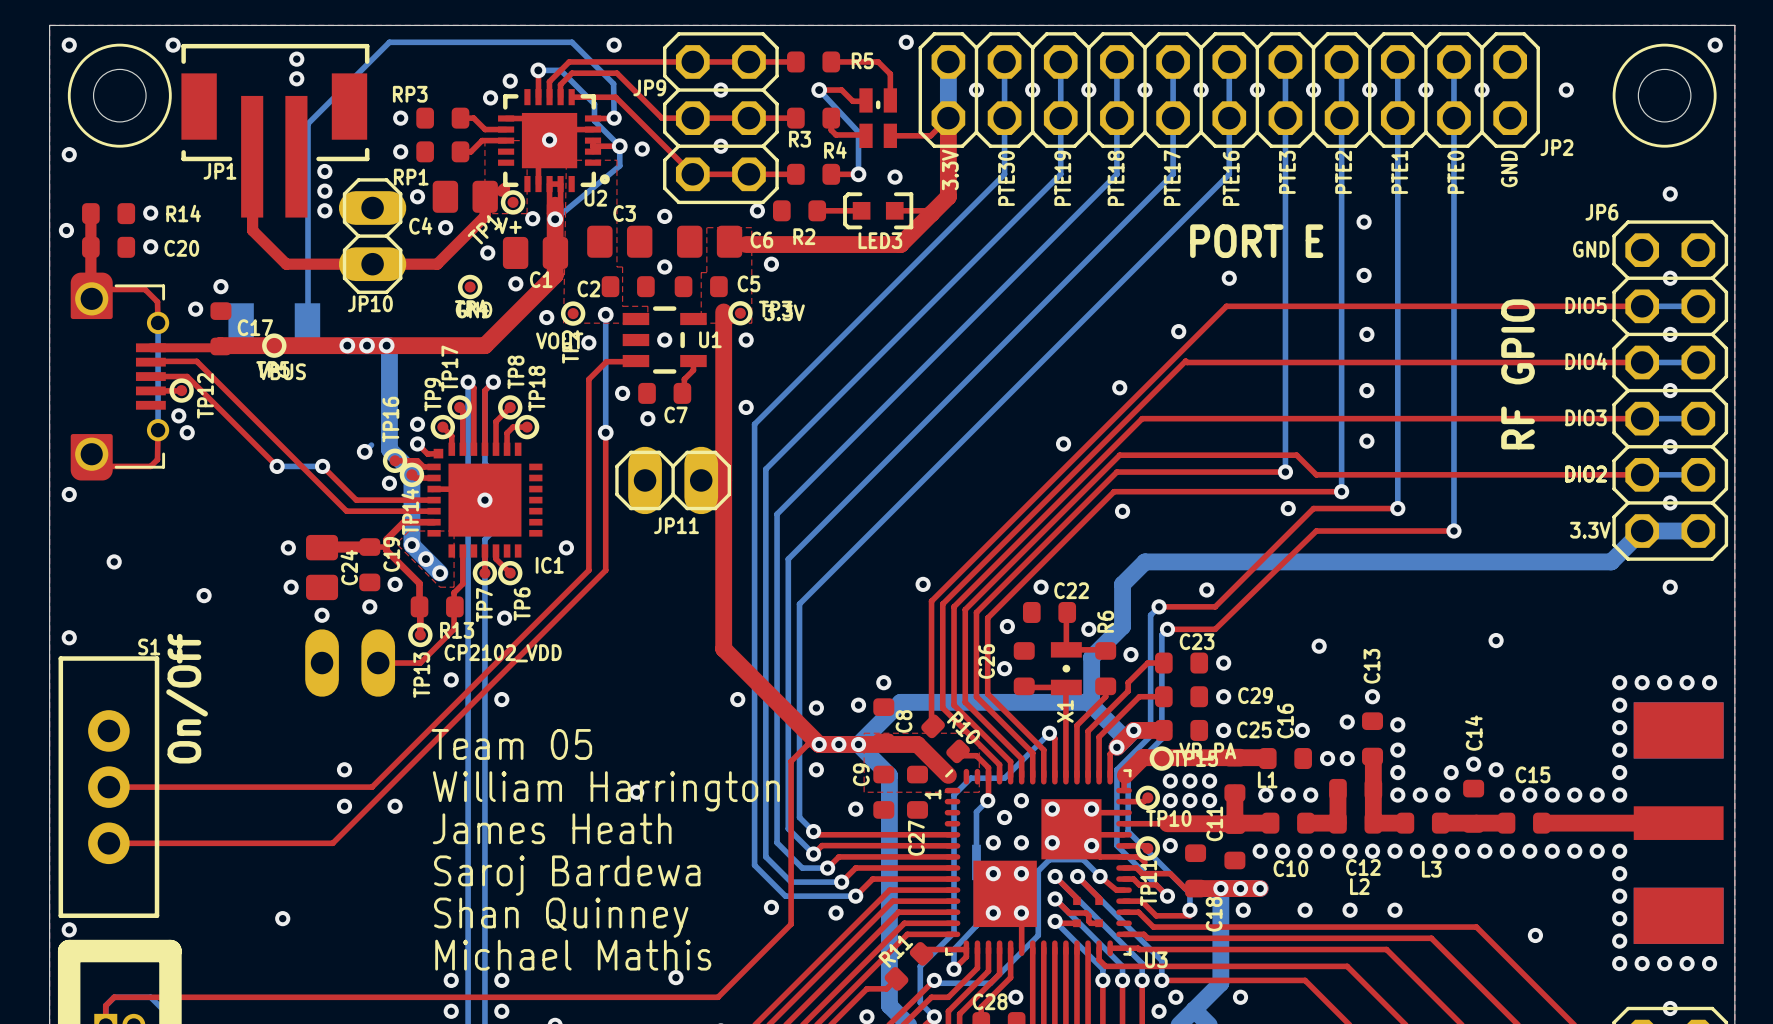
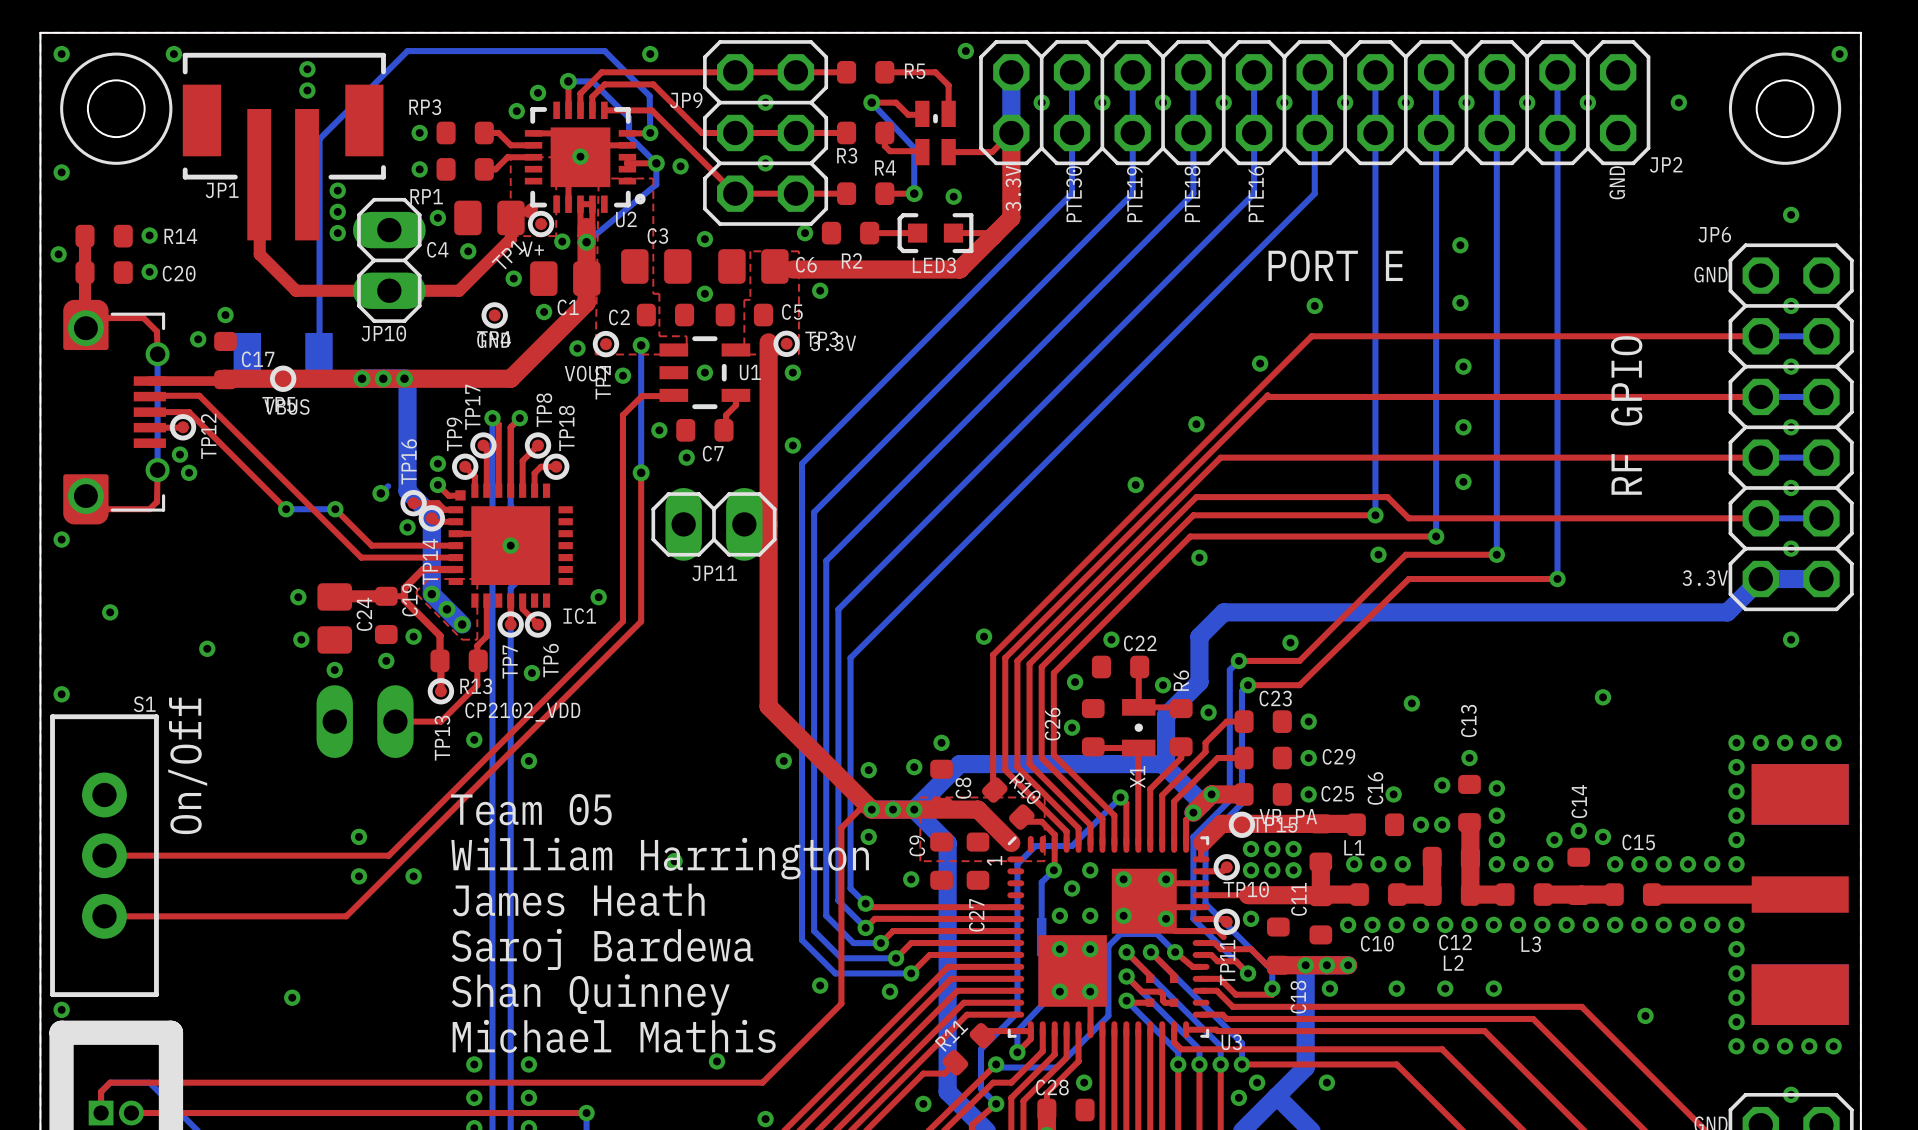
text: PTE3 (1287, 172) -> none
text: PTE2 (1343, 172) -> none
text: PTE1 (1399, 172) -> none
text: PTE0 (1455, 172) -> none
text: PTE17 (1172, 178) -> none
text position: PTE16 (1231, 178) -> PTE16 (1256, 194)
text: DIO5 (1586, 305) -> none
text: DIO4 (1586, 361) -> none
text: DIO3 (1586, 417) -> none
text: DIO2 (1586, 474) -> none

